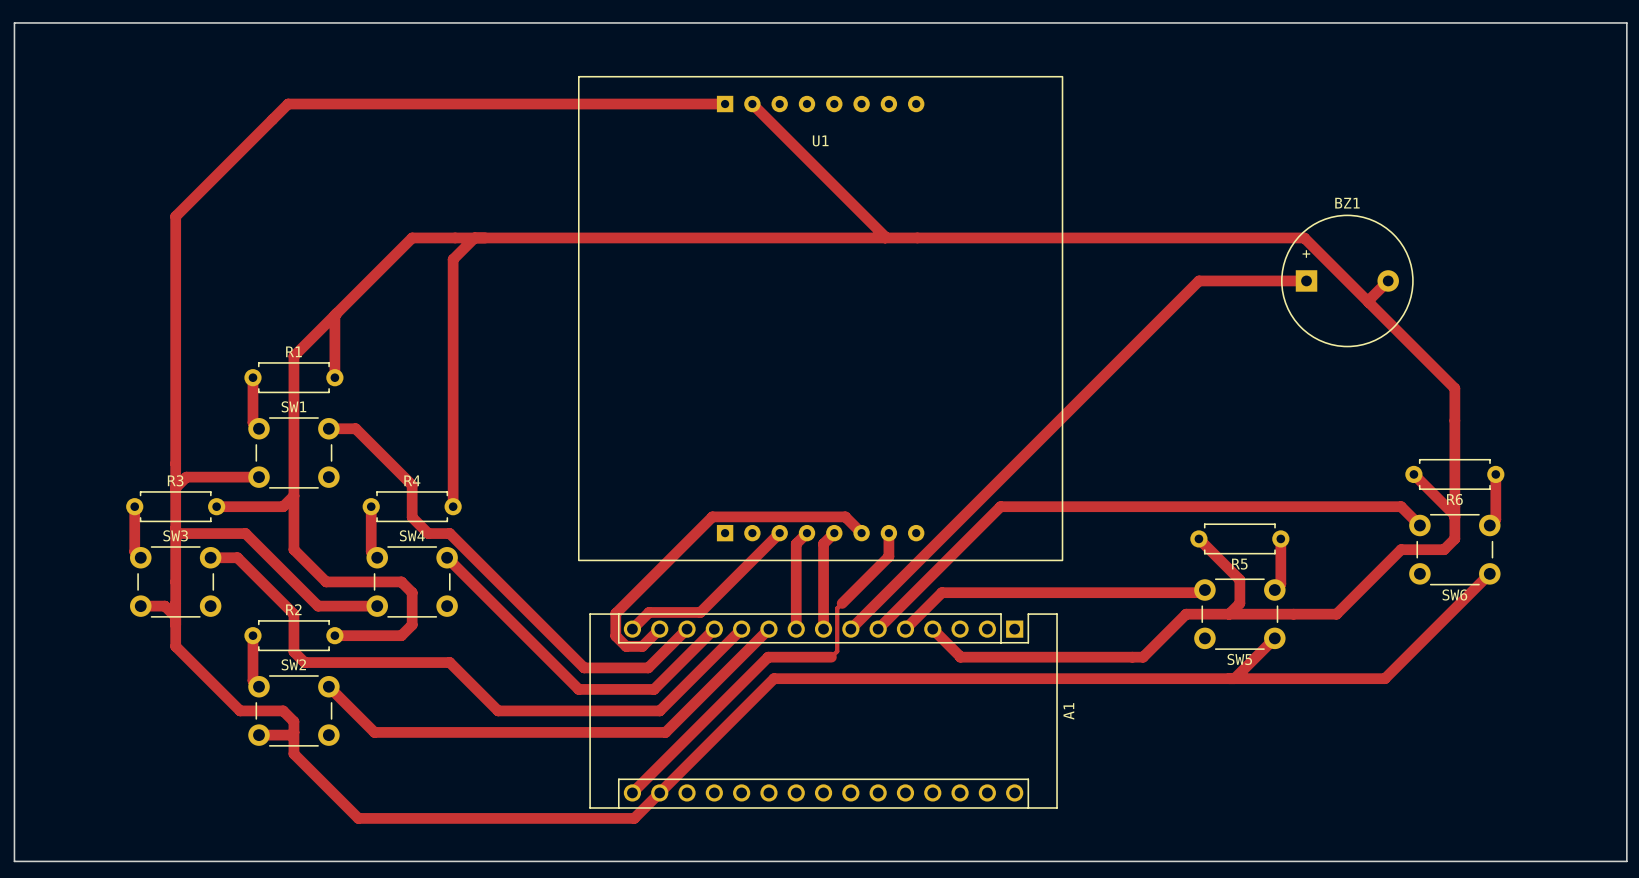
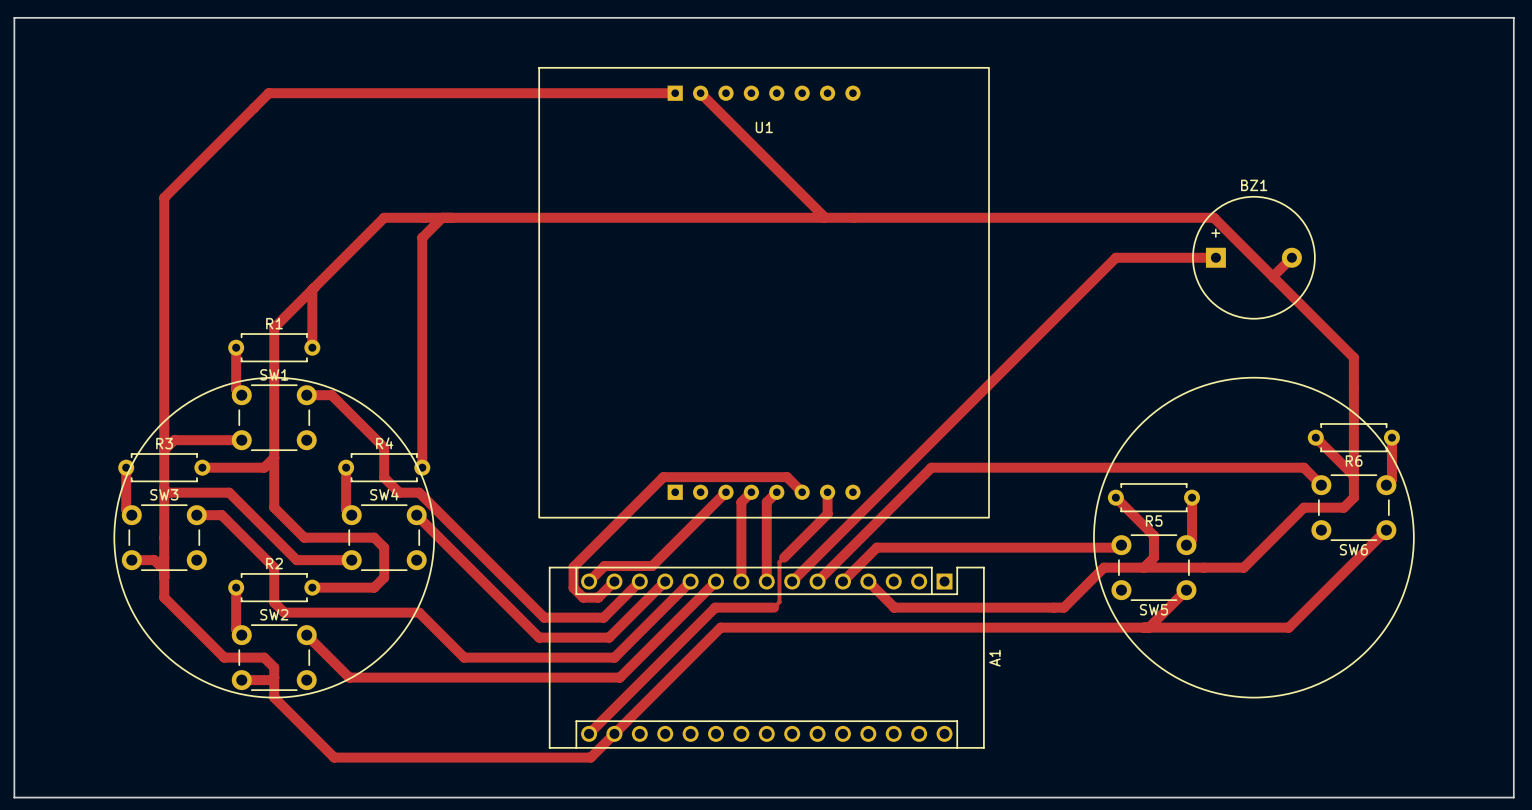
drawing: none -> [113, 376, 435, 699]
drawing: none -> [1093, 376, 1415, 699]

